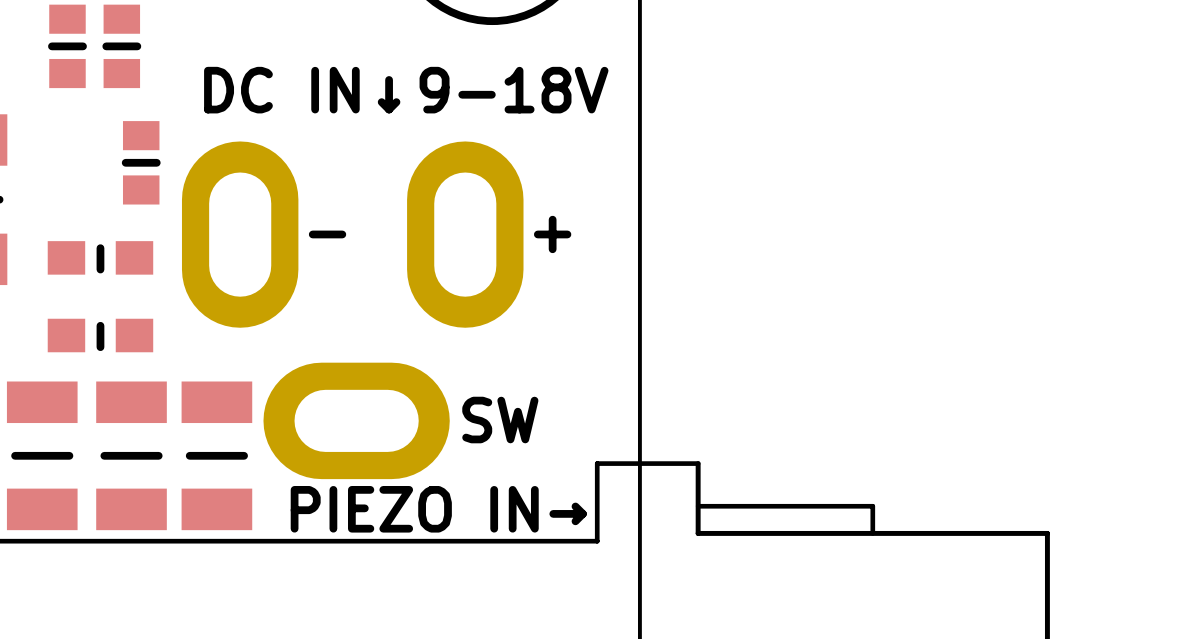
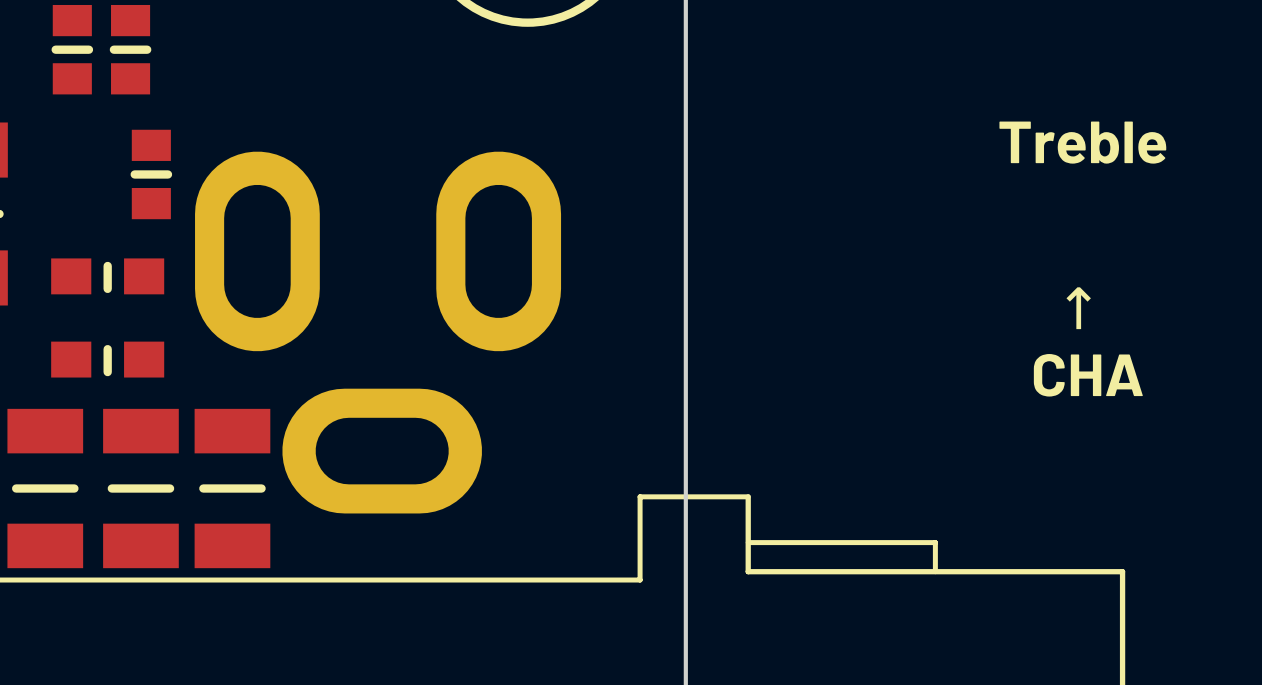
text: DC IN↓ (302, 90) -> none
text: 9-18V (514, 90) -> none
text: none -> Treble (1082, 142)
text: - (327, 234) -> none
text: + (552, 234) -> none
text: none -> ↑ (1078, 308)
text: none -> CHA (1088, 375)
text: SW (500, 420) -> none
text: PIEZO IN→ (438, 509) -> none

